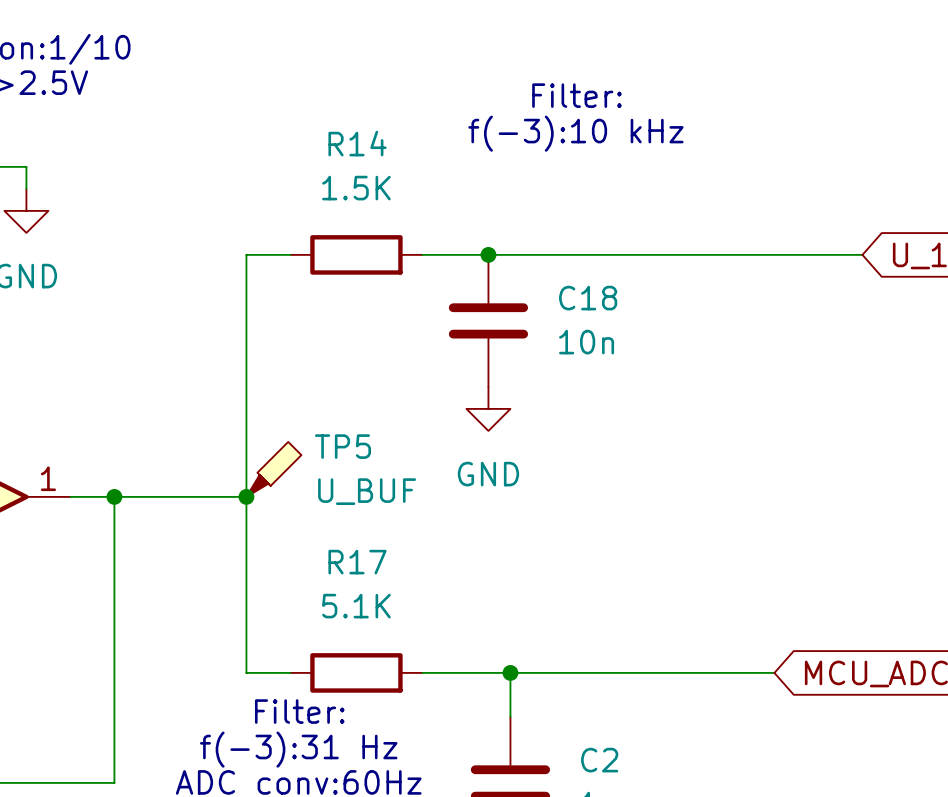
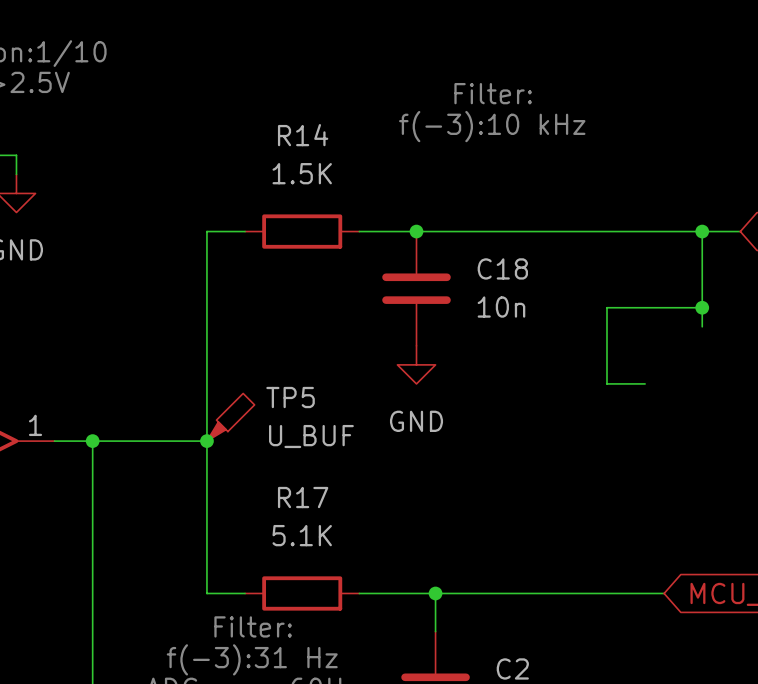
wire: none -> (702, 231) (702, 326)
junction: none -> (702, 231)
wire: none -> (702, 307) (606, 307) (606, 383) (645, 383)
junction: none -> (702, 307)

